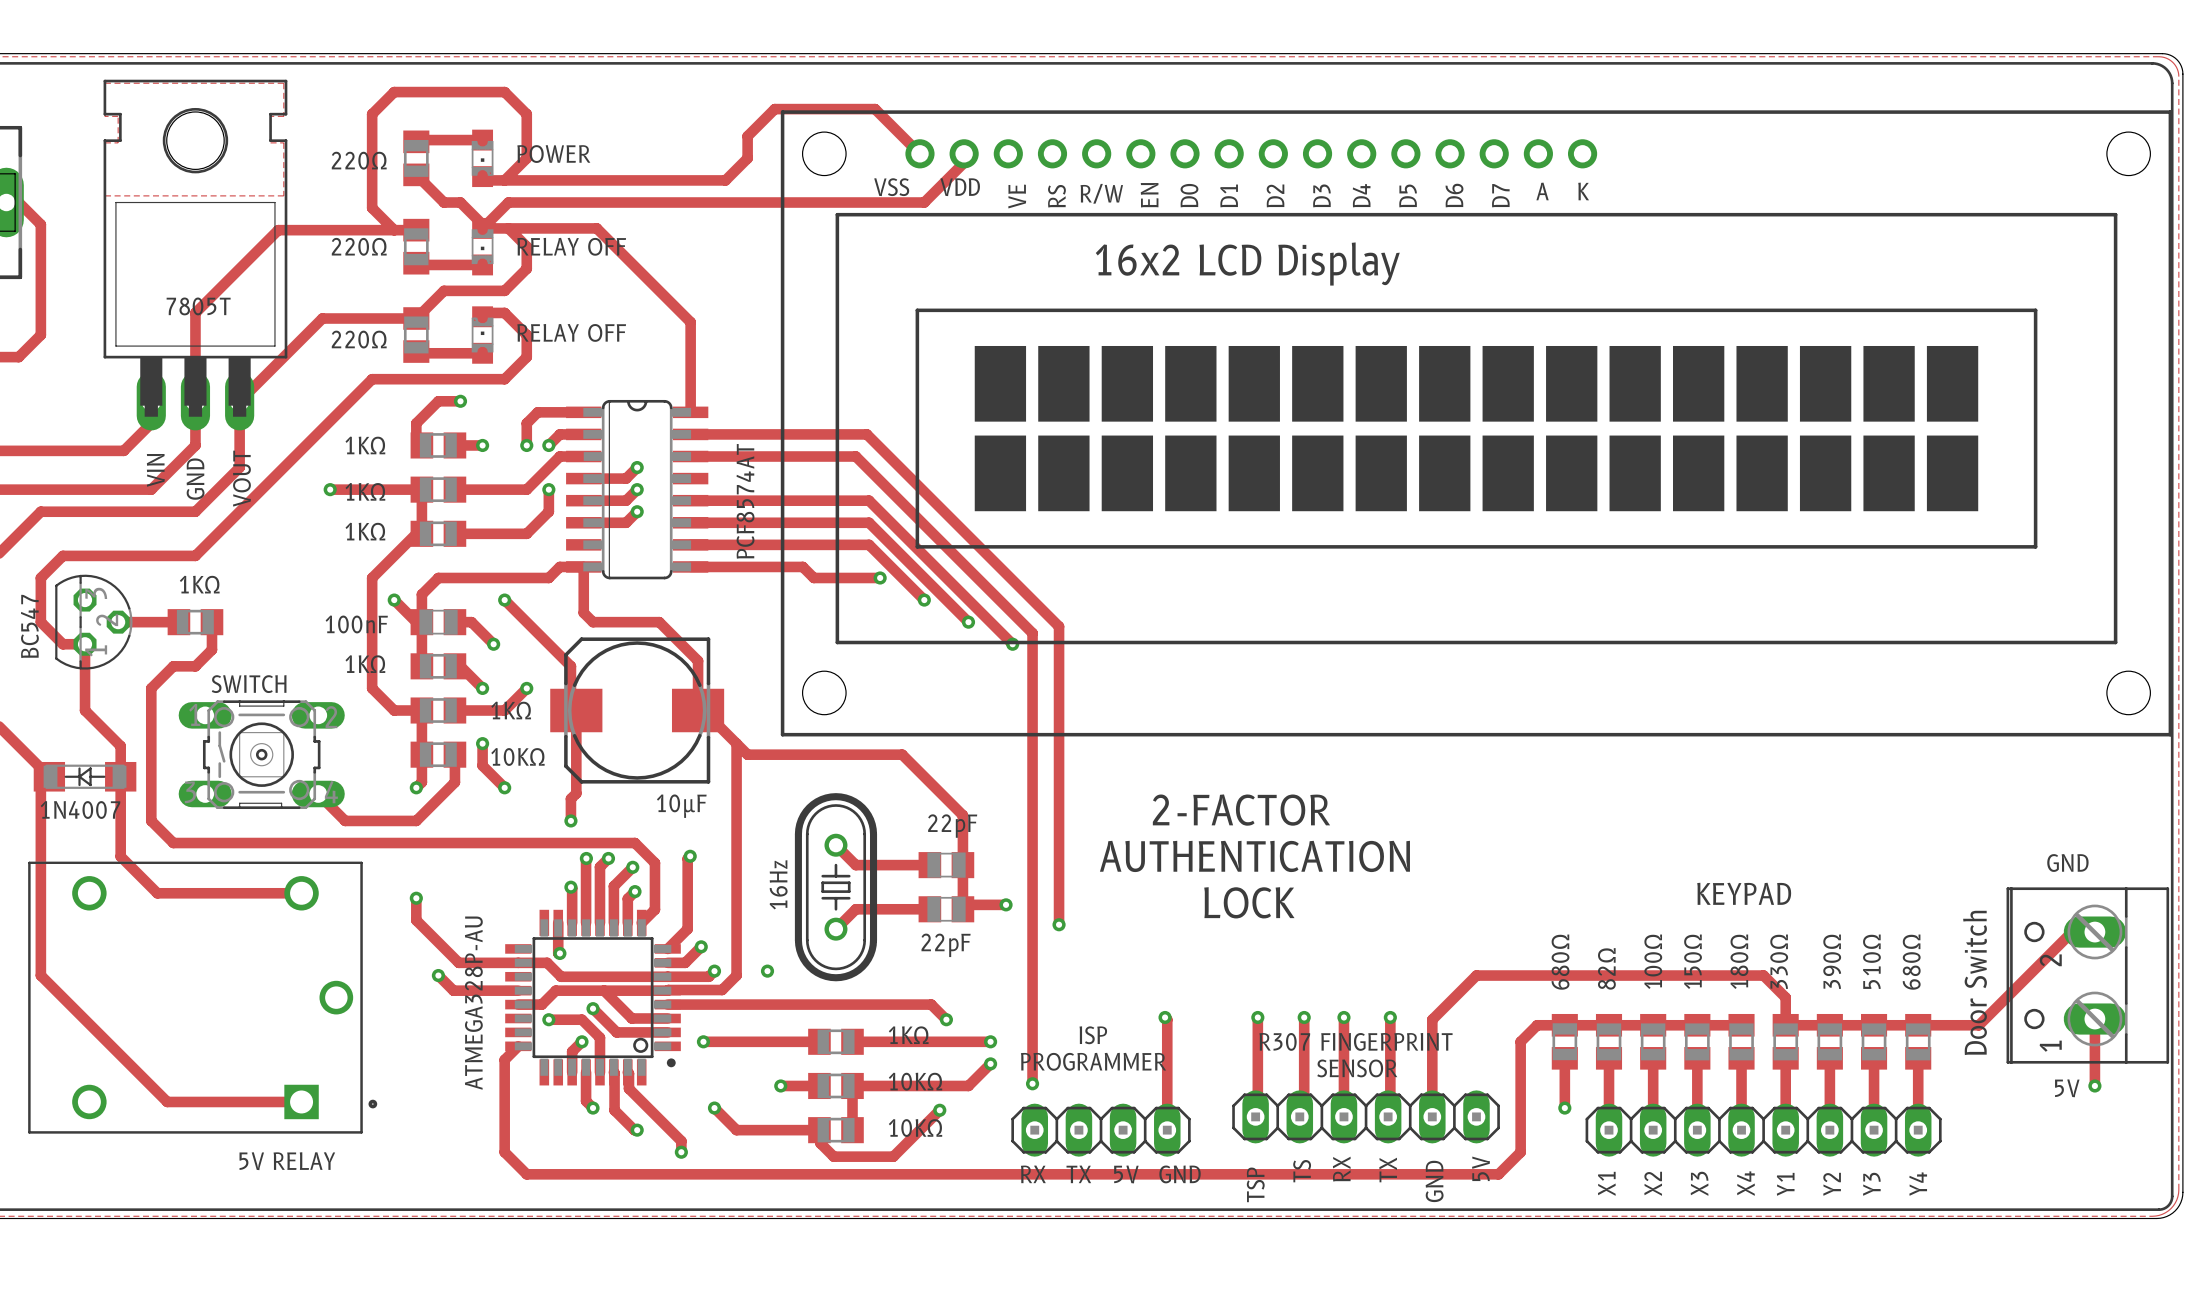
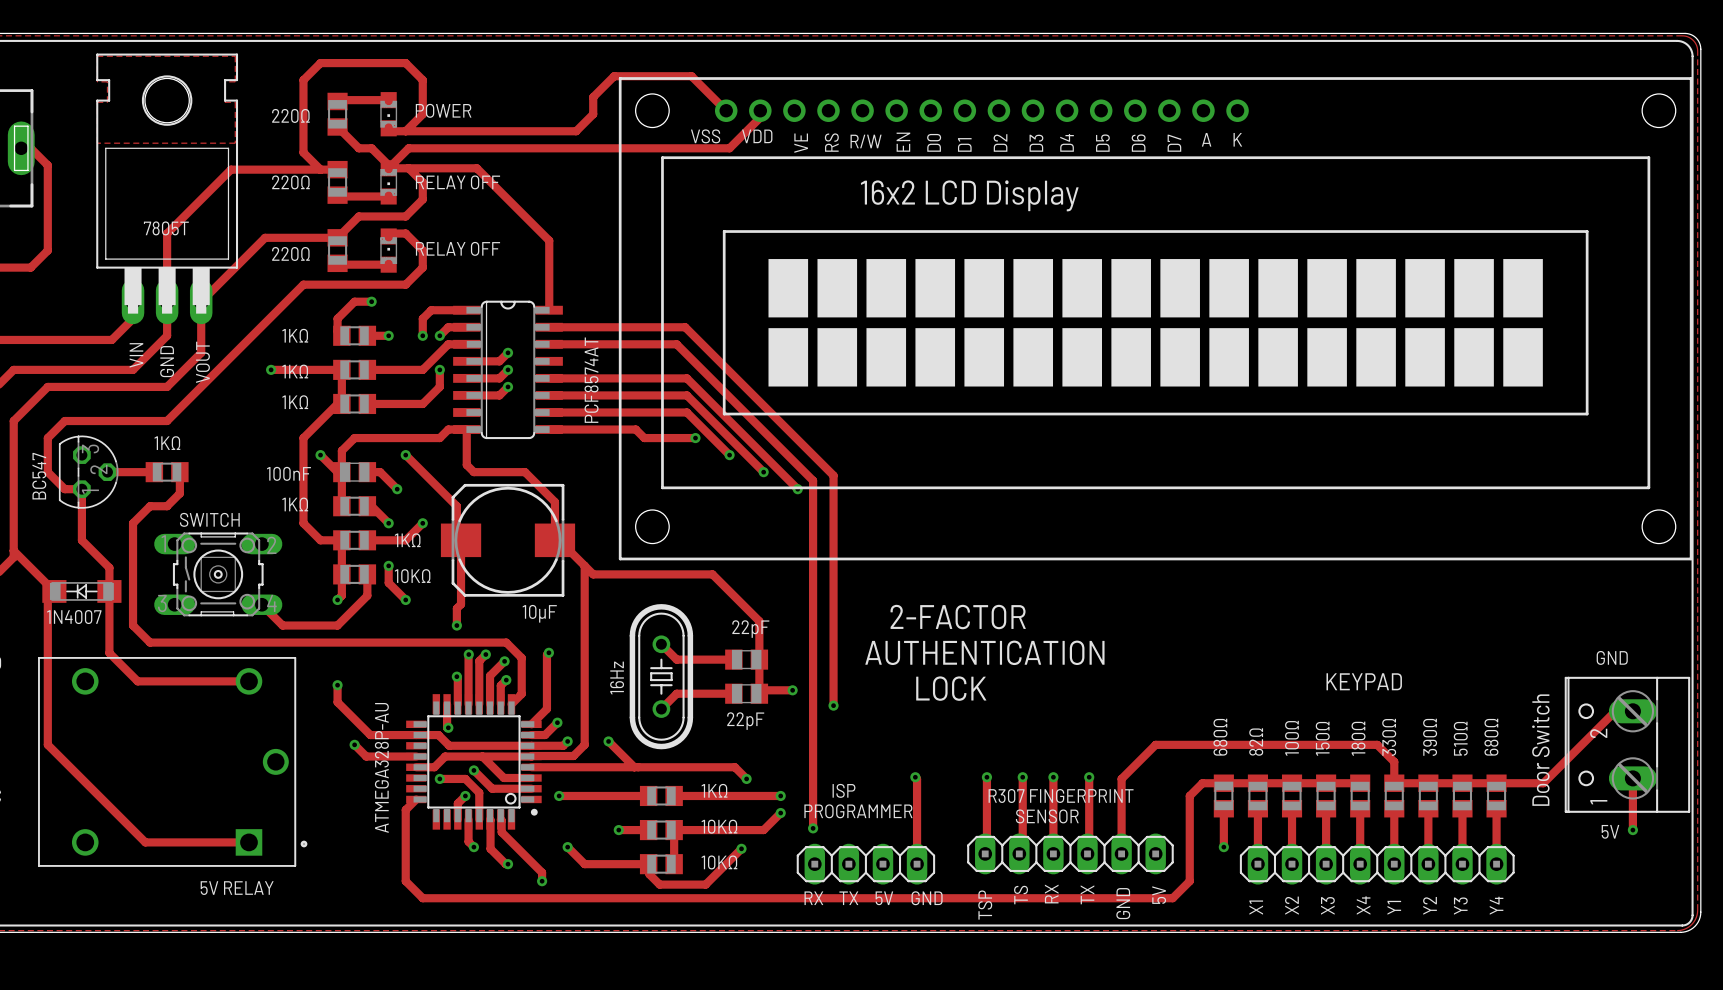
track: none -> (608, 741) (634, 767)

